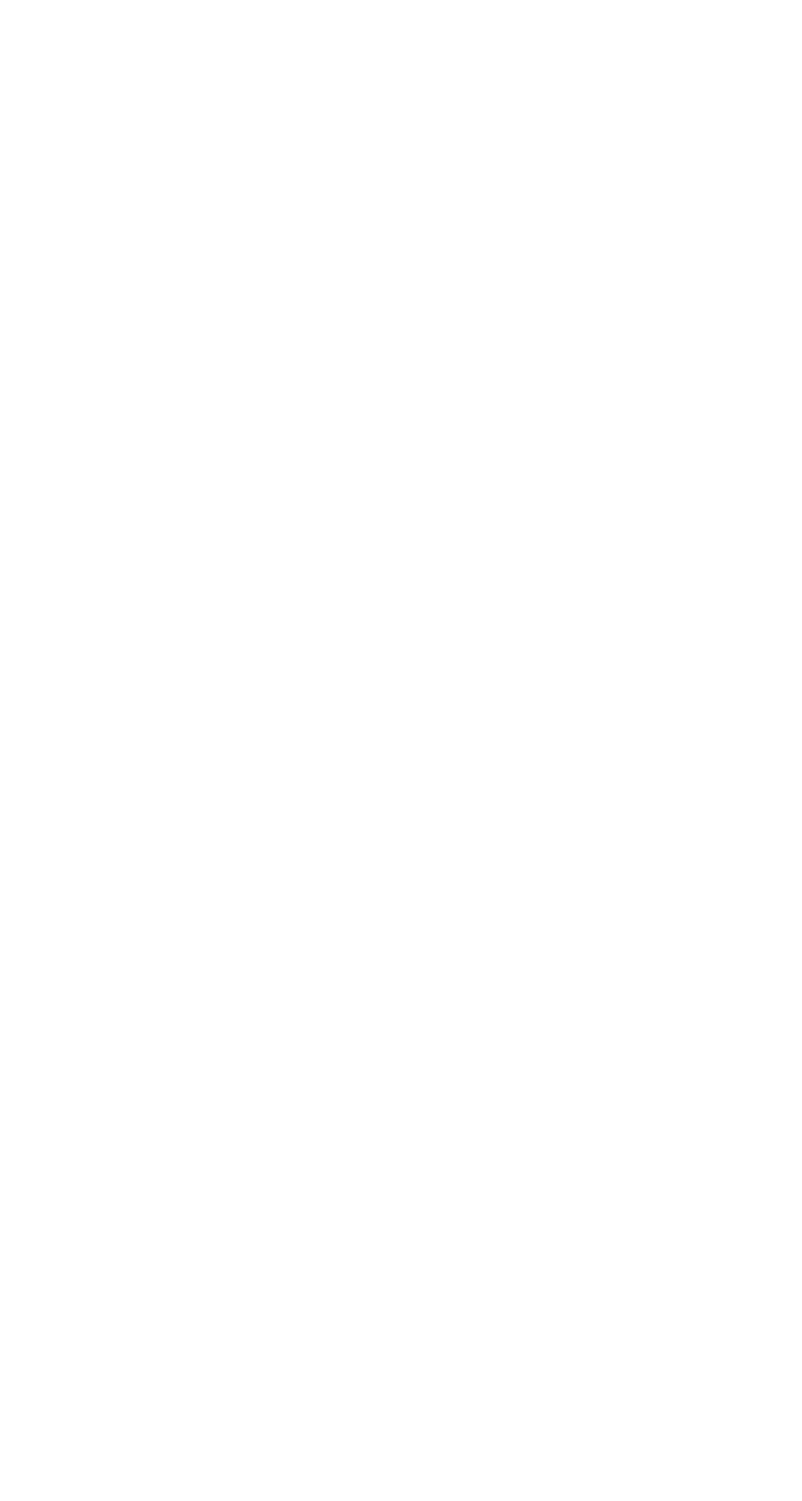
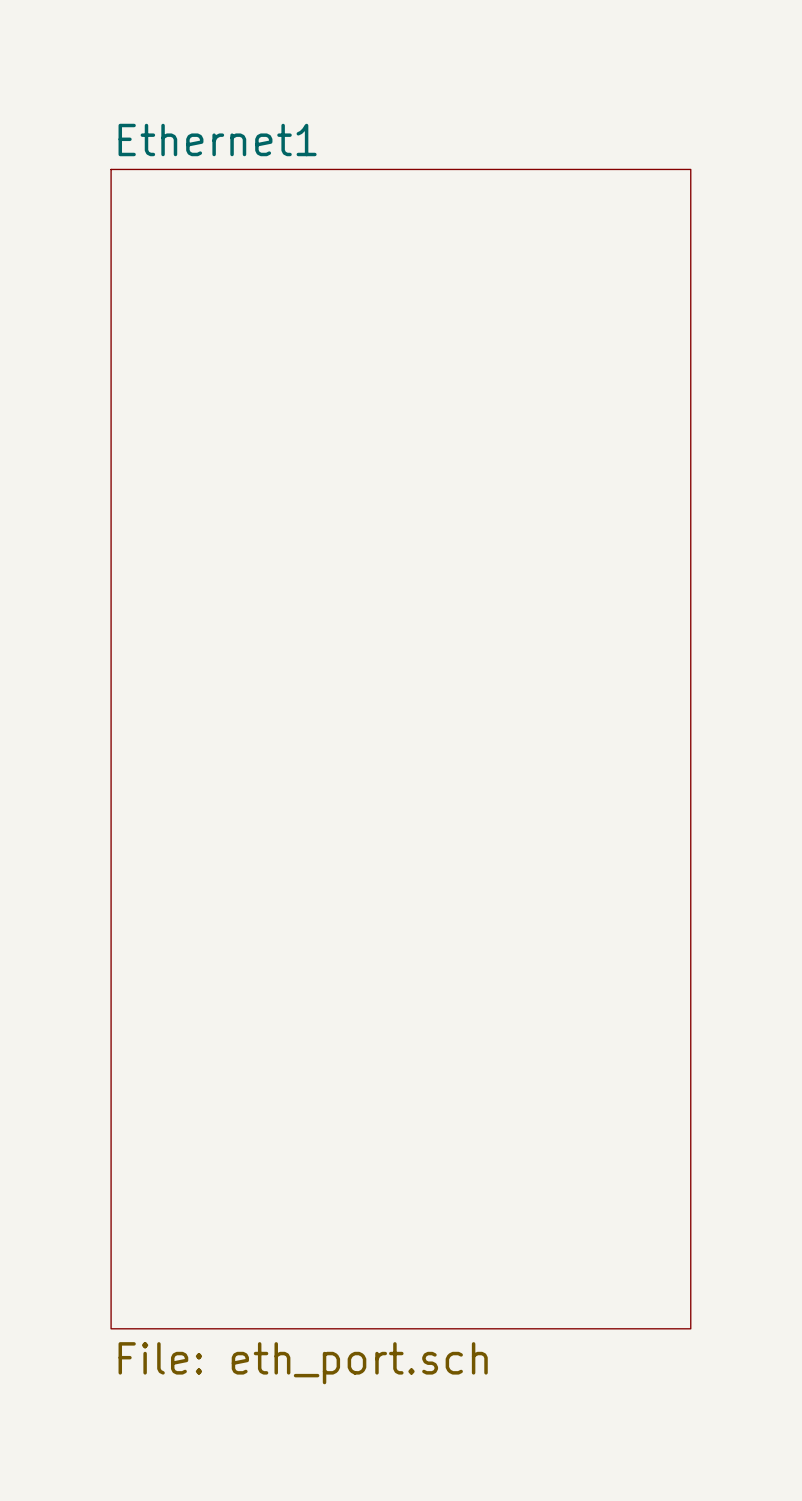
sheet Ethernet1: none -> File: eth_port.sch (400, 749)

